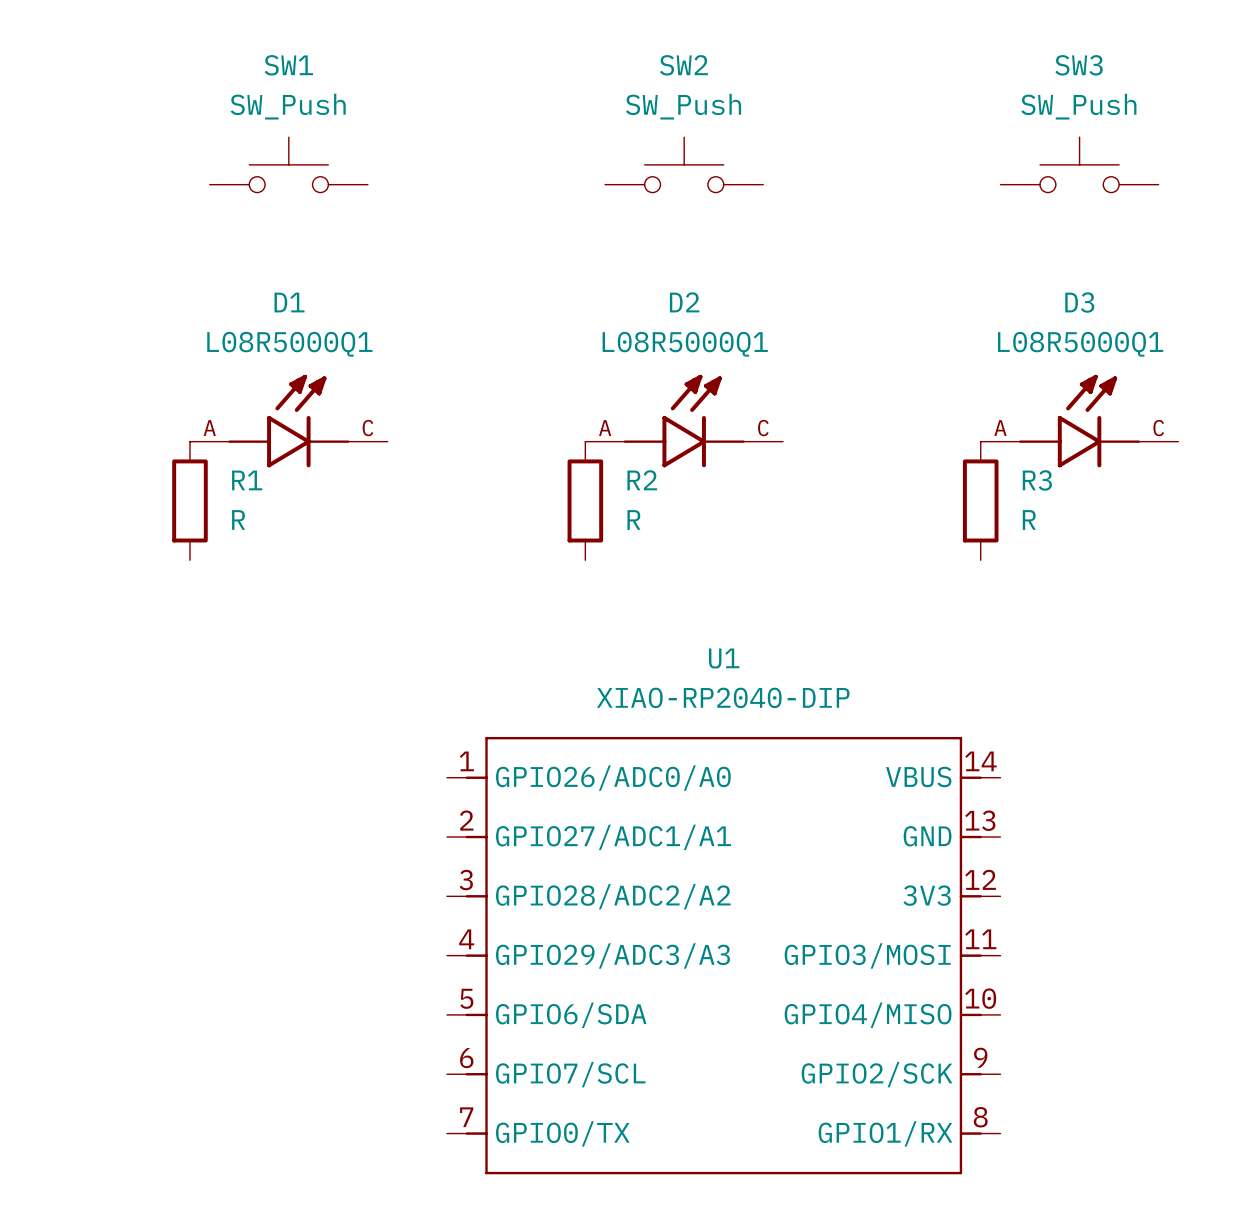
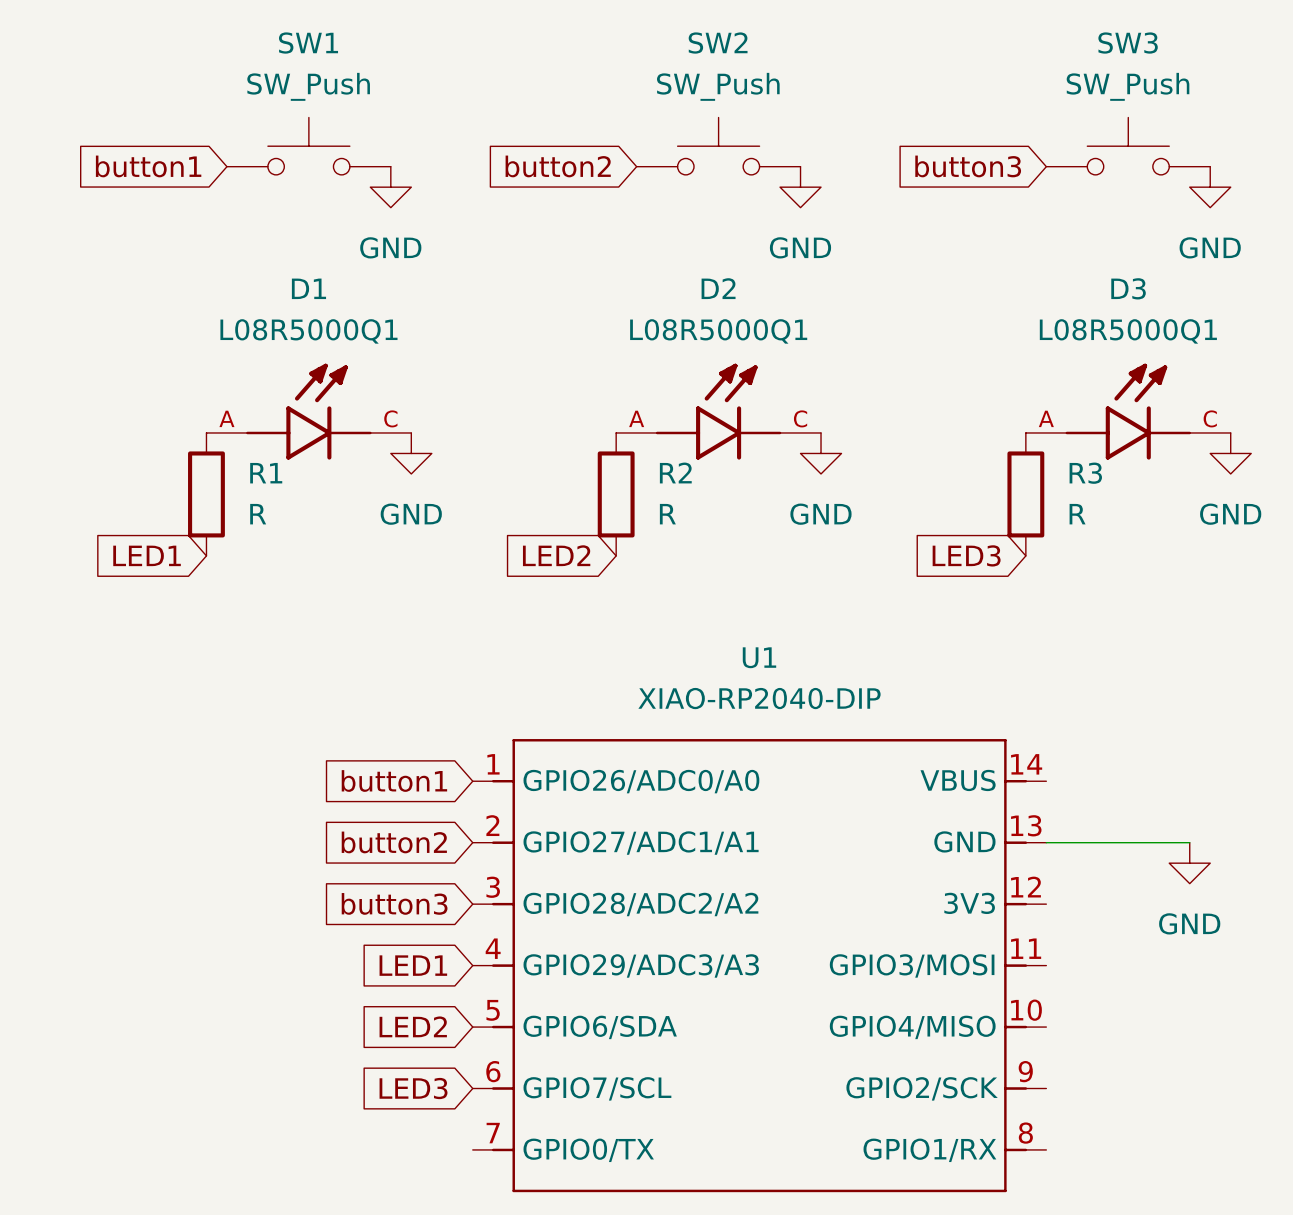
global label: none -> button1 (148, 166)
global label: none -> button2 (558, 166)
global label: none -> button3 (968, 166)
power symbol: none -> GND (390, 187)
power symbol: none -> GND (800, 187)
power symbol: none -> GND (1210, 187)
power symbol: none -> GND (411, 453)
power symbol: none -> GND (821, 453)
power symbol: none -> GND (1230, 453)
global label: none -> LED1 (147, 555)
global label: none -> LED2 (556, 555)
global label: none -> LED3 (966, 555)
global label: none -> button1 (394, 781)
global label: none -> button2 (394, 842)
wire: none -> (1046, 842) (1189, 842)
power symbol: none -> GND (1189, 863)
global label: none -> button3 (394, 903)
global label: none -> LED1 (413, 965)
global label: none -> LED2 (413, 1026)
global label: none -> LED3 (413, 1088)

